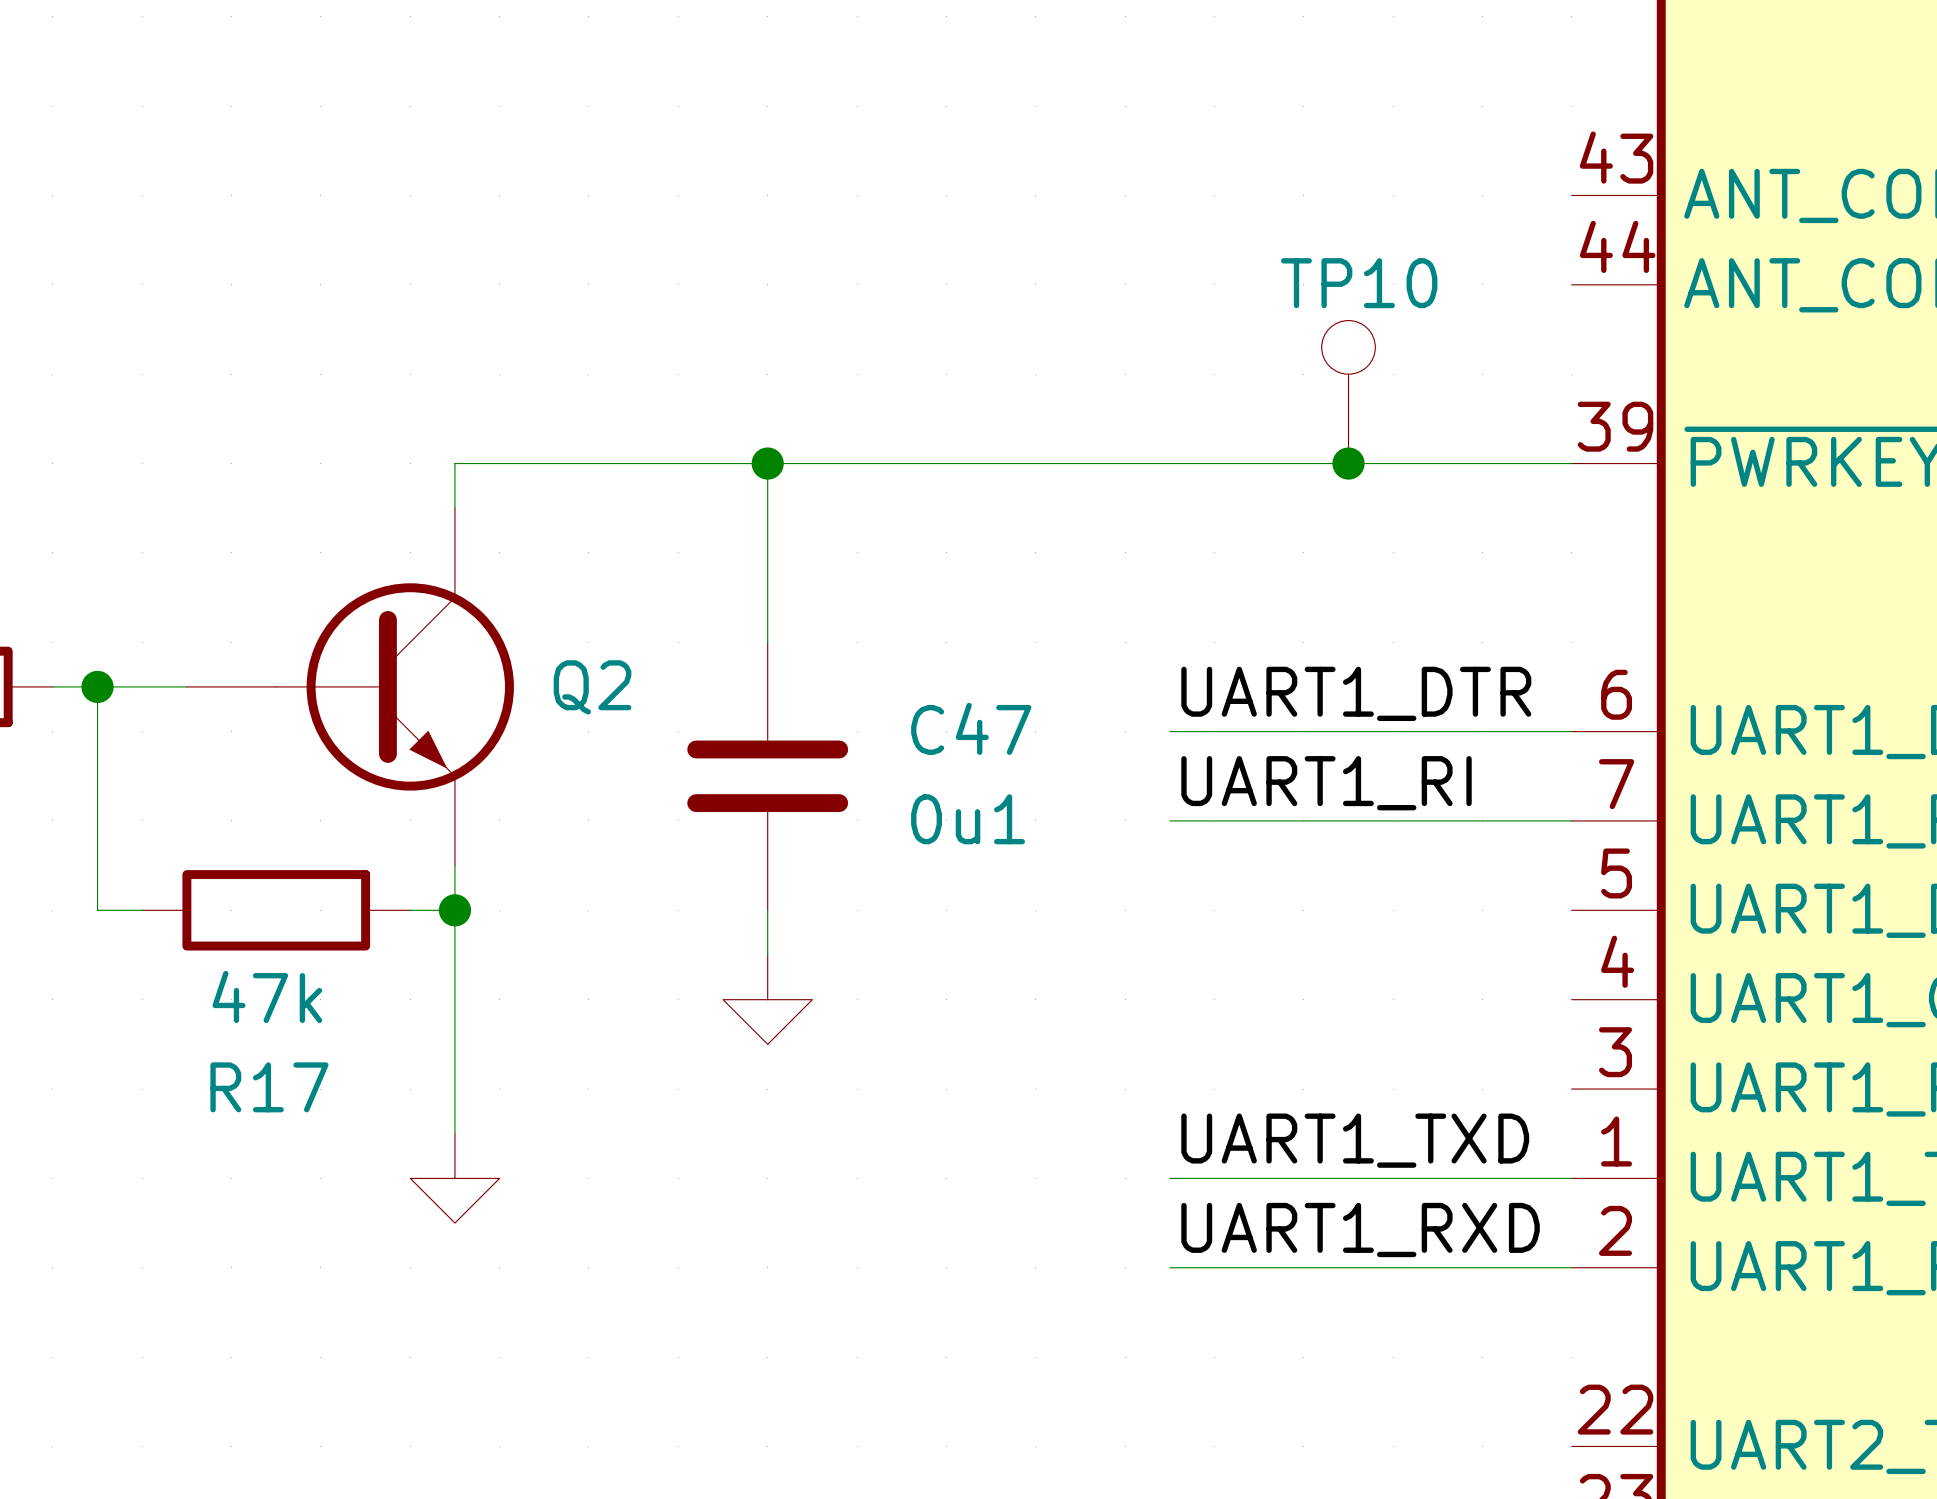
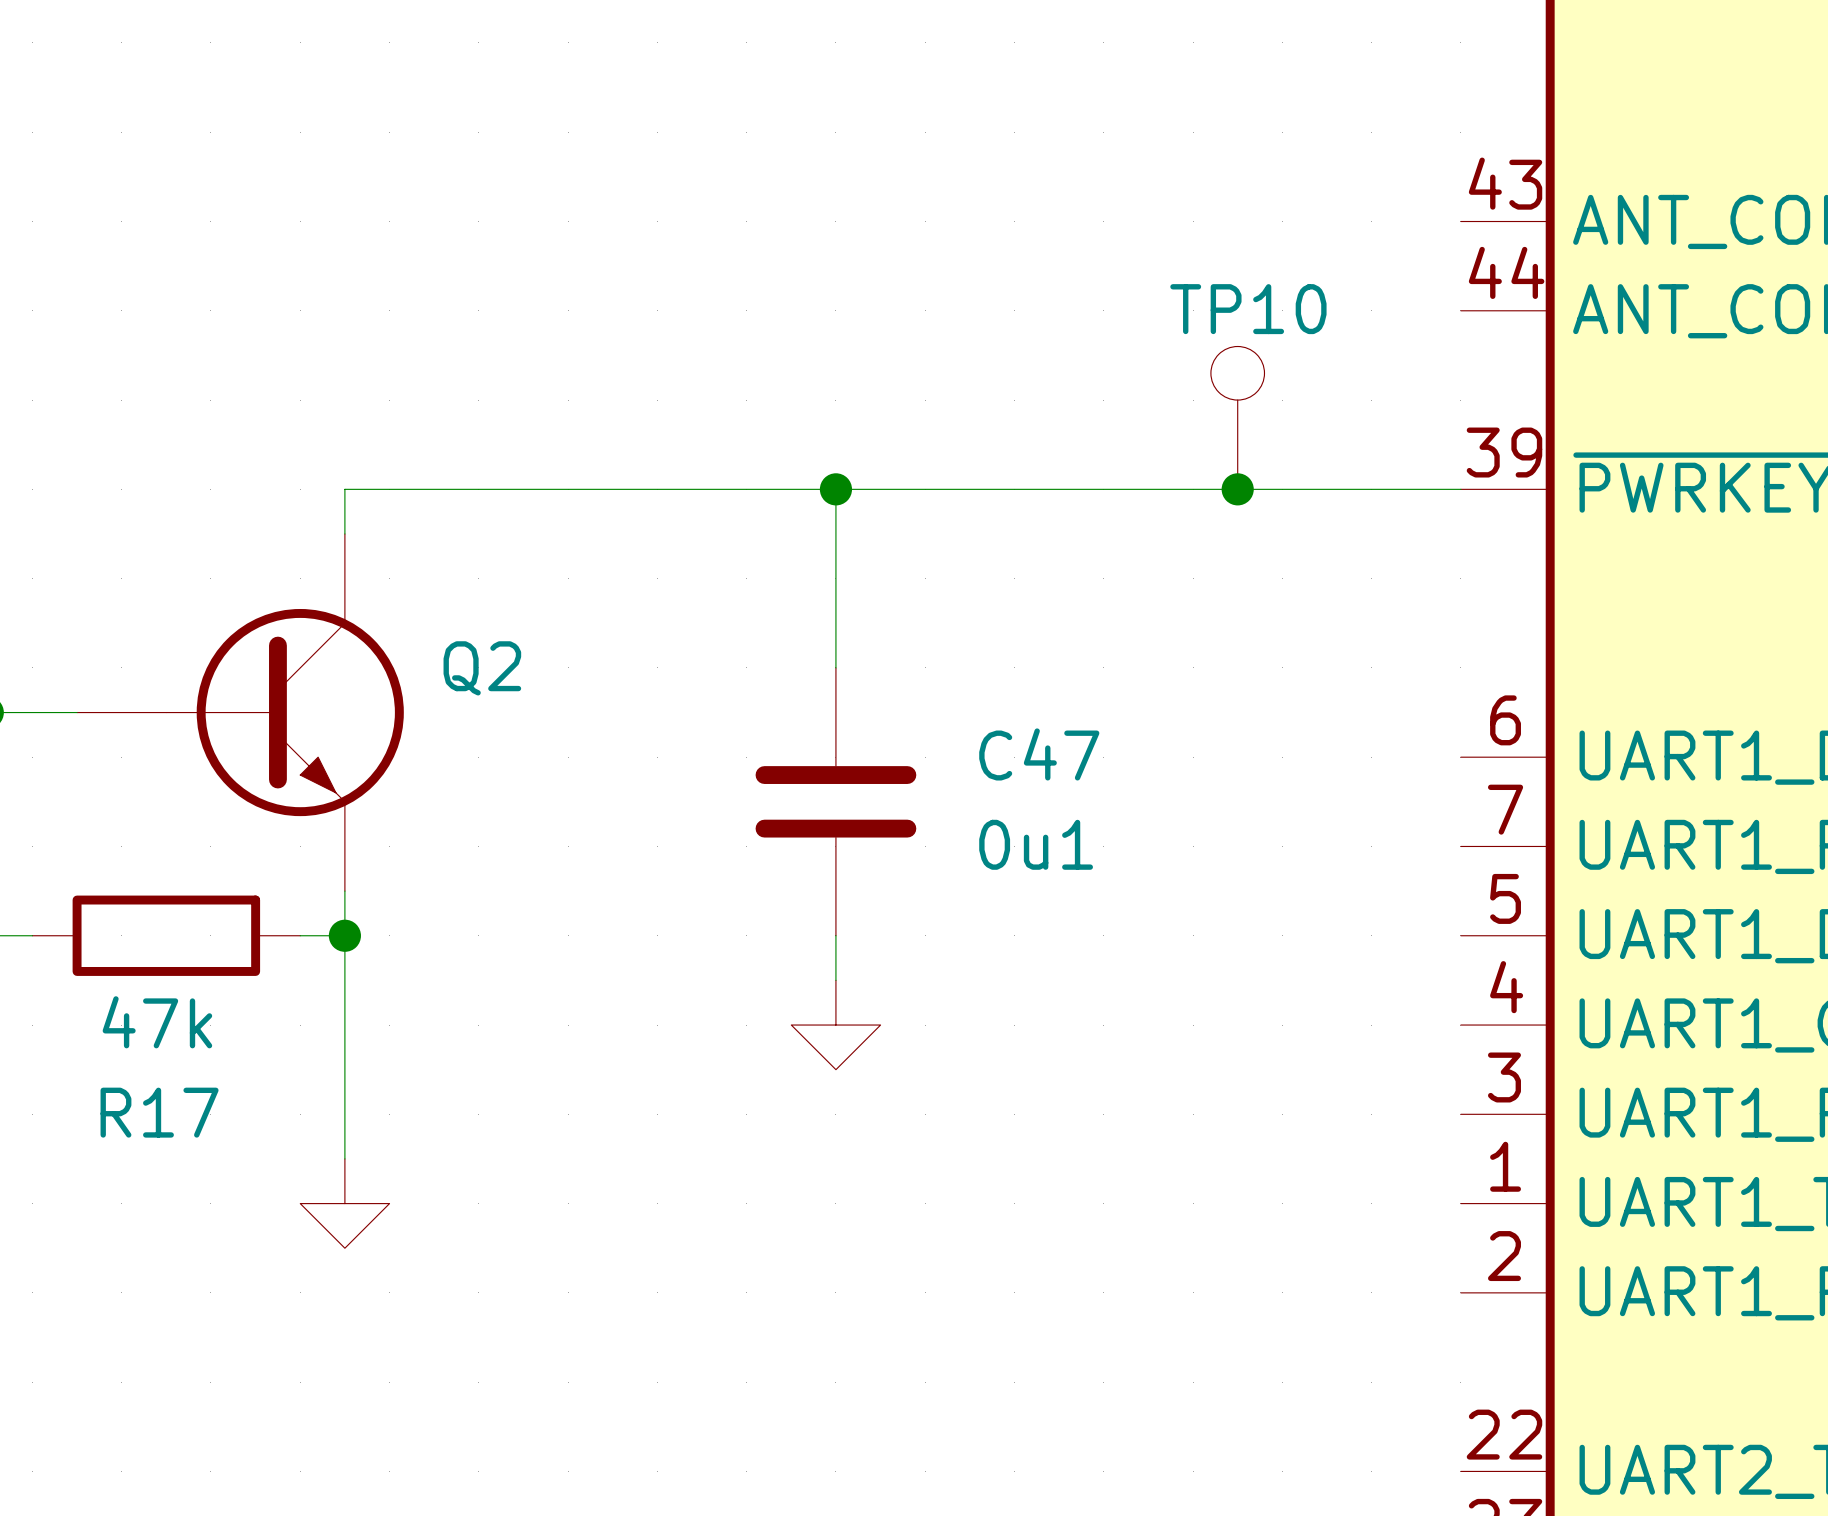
wire: (767, 463) (767, 642) -> (835, 489) (835, 667)
junction position: (767, 463) -> (835, 489)
Q2 name position: Q2 (592, 687) -> Q2 (482, 668)
label: UART1_DTR (1356, 693) -> none
wire: (1169, 731) (1571, 731) -> none
C47 position: (767, 776) -> (835, 801)
label: UART1_RI (1326, 783) -> none
wire: (1169, 820) (1571, 820) -> none
wire: (767, 910) (767, 955) -> (835, 935) (835, 980)
power symbol position: (767, 999) -> (835, 1025)
label: UART1_TXD (1355, 1140) -> none
wire: (1169, 1178) (1571, 1178) -> none
label: UART1_RXD (1360, 1230) -> none
wire: (1169, 1267) (1571, 1267) -> none

